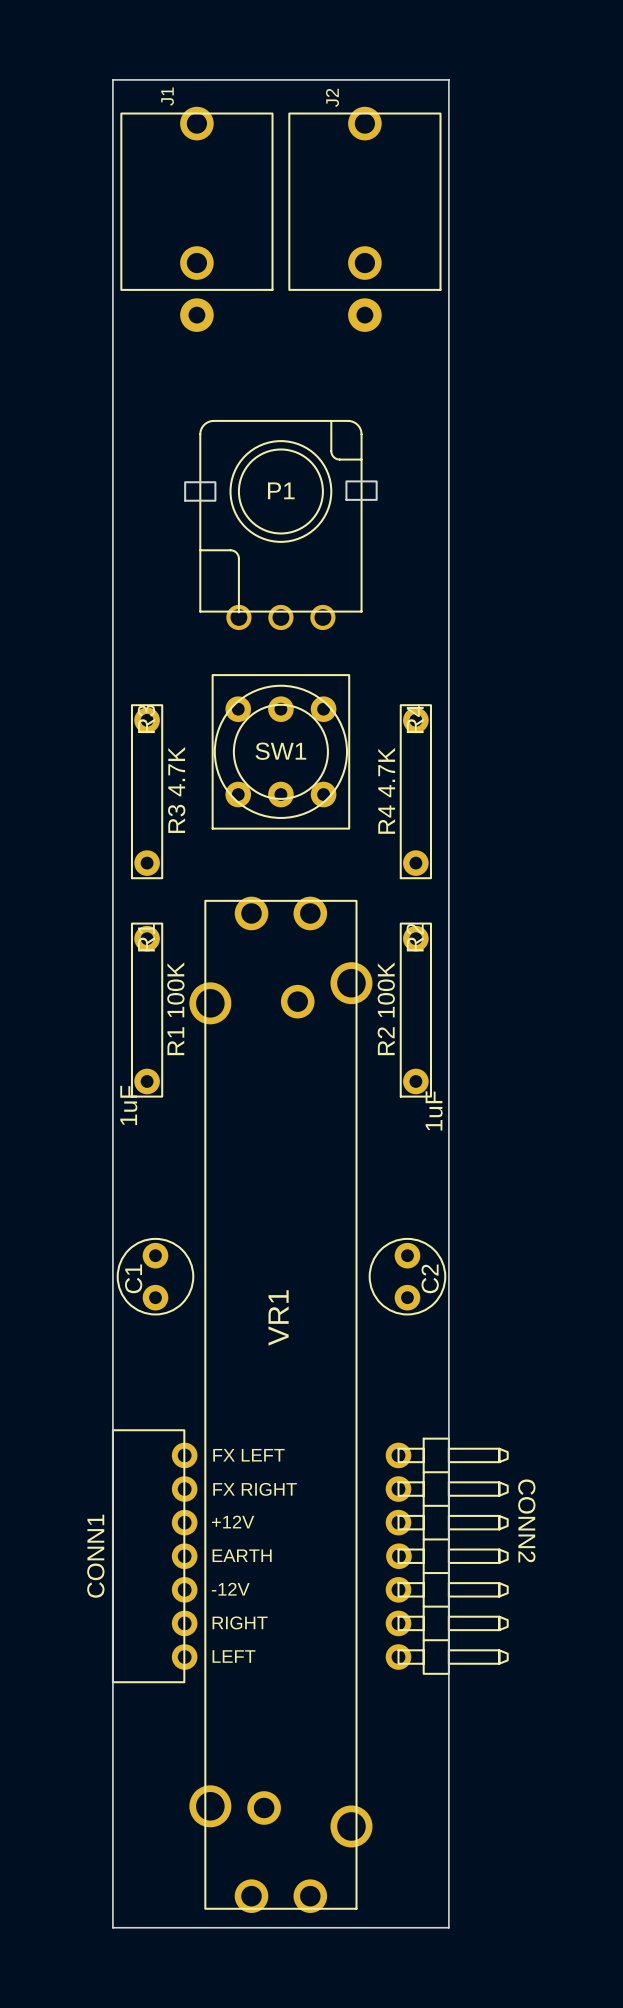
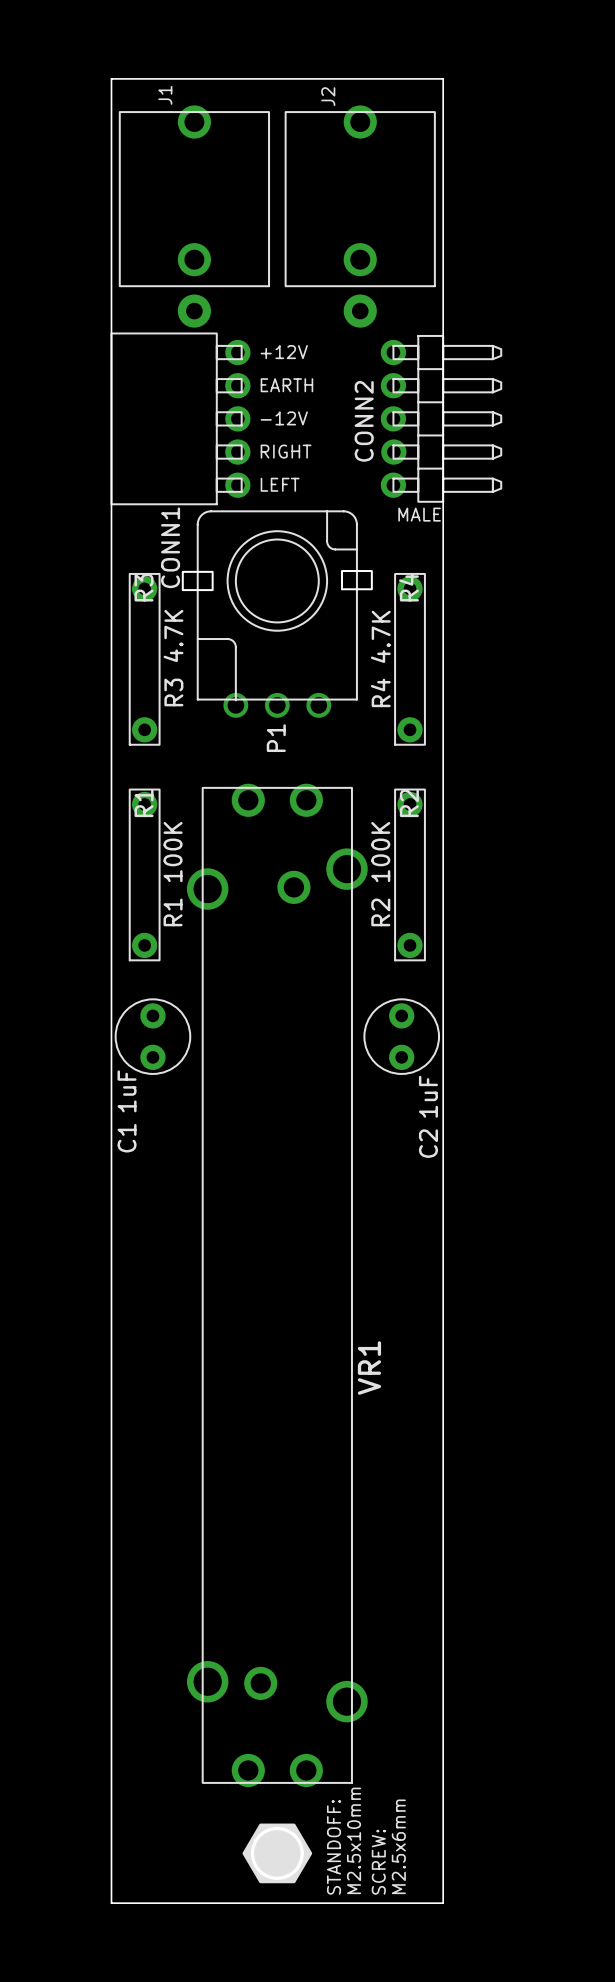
text: none -> +12V (284, 352)
text: none -> EARTH (286, 385)
text: none -> -12V (284, 418)
text: none -> RIGHT (286, 451)
P1 name rotation: 0° (281, 490) -> 90° counterclockwise (276, 738)
P1 name position: P1 (281, 490) -> P1 (276, 738)
text: none -> LEFT (280, 484)
text: none -> MALE (419, 514)
P1 position: (280, 524) -> (277, 614)
SW1: (280, 751) -> none
R3 position: (147, 791) -> (144, 659)
R4 position: (415, 791) -> (410, 659)
R1 position: (147, 1010) -> (144, 874)
R2 position: (415, 1010) -> (410, 874)
C1 position: (155, 1276) -> (152, 1036)
C2 position: (407, 1276) -> (401, 1036)
C1 name position: C1 (133, 1278) -> C1 (127, 1138)
C2 name position: C2 (430, 1278) -> C2 (428, 1143)
VR1 name position: VR1 (278, 1317) -> VR1 (369, 1368)
VR1 position: (280, 1404) -> (277, 1285)
CONN1 footprint: [111, 1429, 198, 1684] -> [110, 332, 251, 506]
CONN2 footprint: [385, 1437, 509, 1675] -> [380, 334, 503, 503]
text: FX LEFT (248, 1455) -> none
text: FX RIGHT (255, 1489) -> none
CONN2 name position: CONN2 (526, 1520) -> CONN2 (364, 421)
text: +12V (233, 1522) -> none
text: EARTH (242, 1555) -> none
CONN1 name position: CONN1 (95, 1556) -> CONN1 (170, 547)
text: -12V (230, 1589) -> none
text: RIGHT (240, 1622) -> none
text: LEFT (233, 1656) -> none
drawing: none -> [242, 1823, 313, 1884]
text: none -> STANDOFF: (334, 1847)
text: none -> M2.5x10mm (354, 1840)
text: none -> M2.5x6mm (398, 1846)
text: none -> SCREW: (378, 1862)

